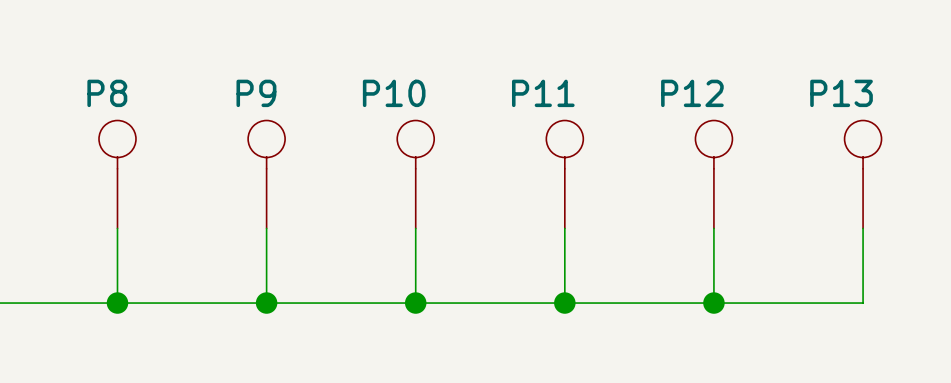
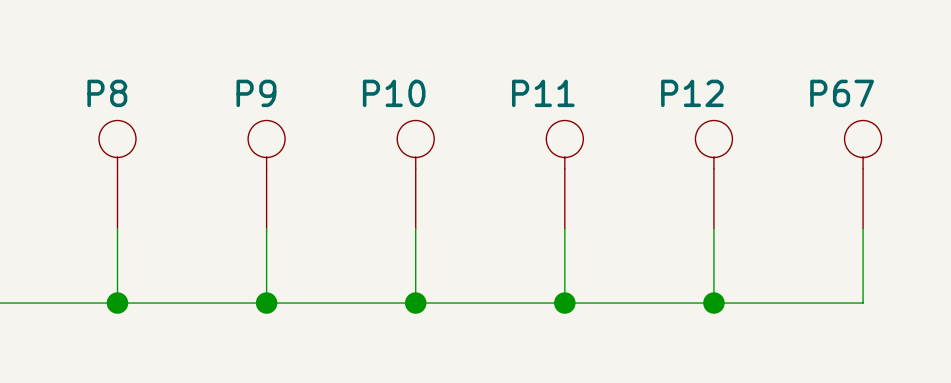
P13 name: P13 (841, 93) -> P67 (842, 93)

